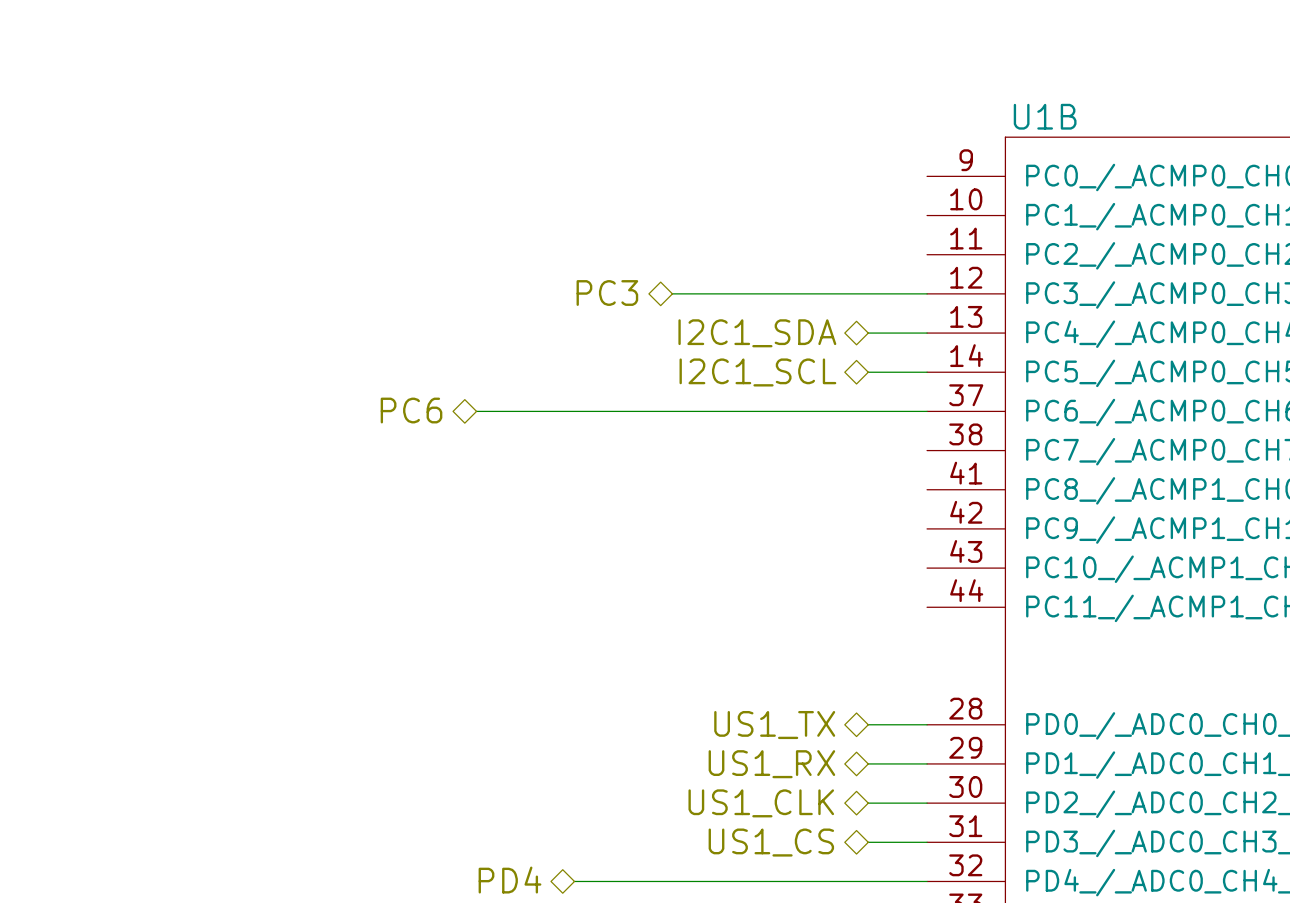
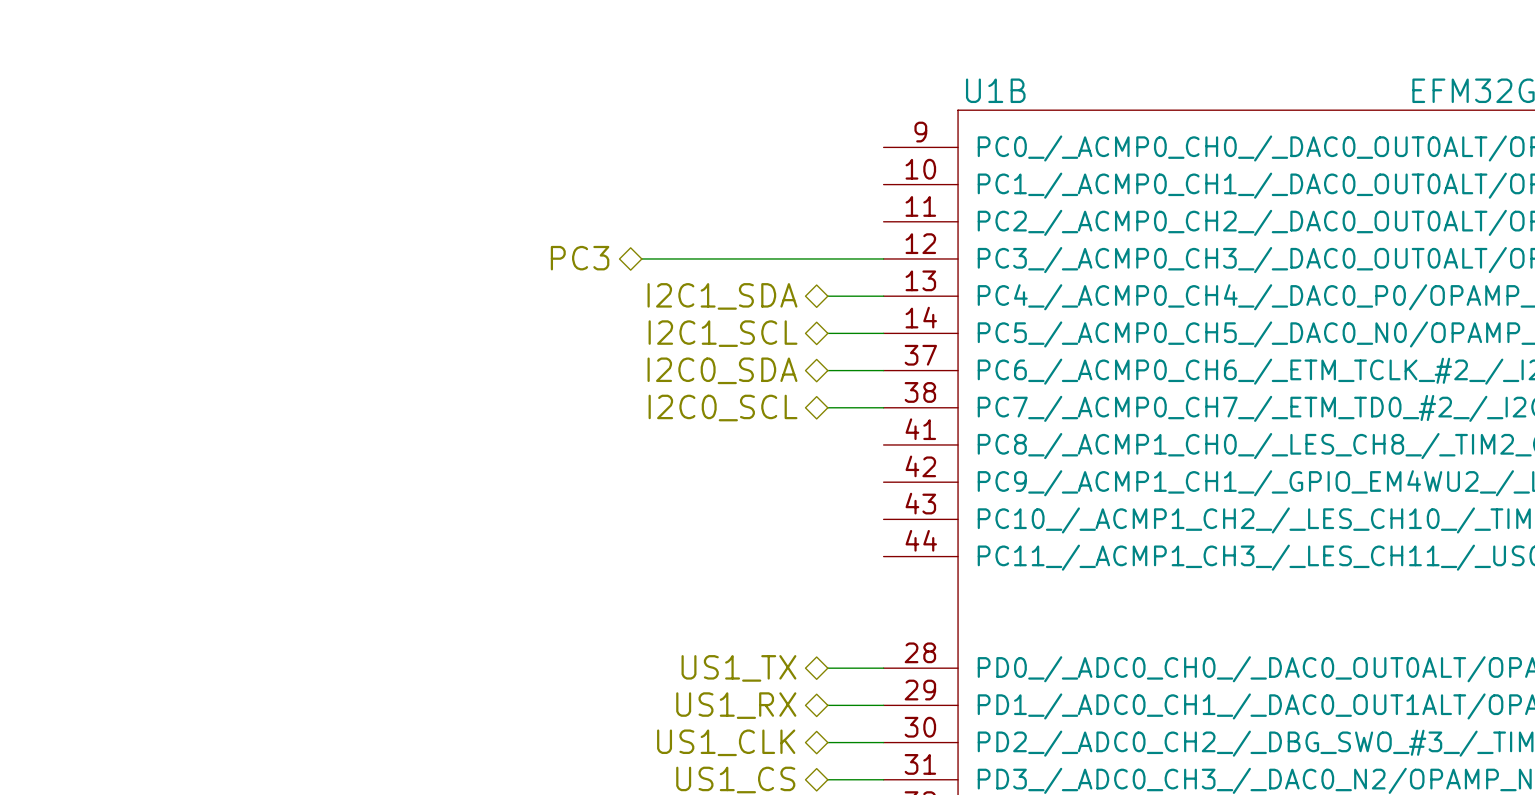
hierarchical label: PC6 (411, 410) -> none
wire: (476, 411) (868, 411) -> none
hierarchical label: none -> I2C0_SDA (722, 370)
hierarchical label: none -> I2C0_SCL (723, 408)
wire: none -> (827, 407) (883, 407)

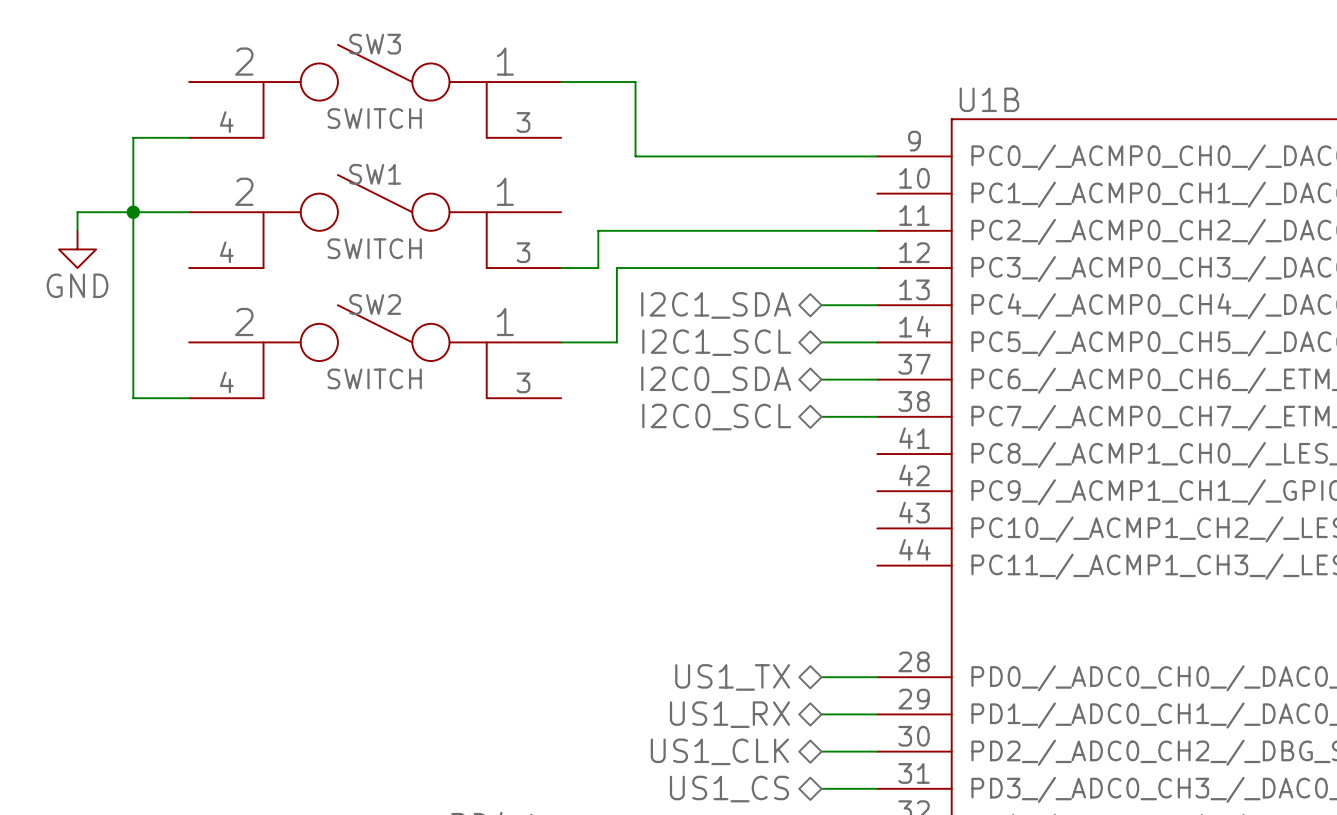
wire: none -> (561, 82) (635, 82) (635, 156) (877, 156)
SW3: none -> SWITCH (375, 91)
wire: none -> (189, 137) (133, 137) (133, 398) (189, 398)
junction: none -> (133, 212)
wire: none -> (189, 212) (77, 212) (77, 230)
SW1: none -> SWITCH (375, 221)
wire: none -> (877, 230) (598, 230) (598, 268) (561, 268)
power symbol: none -> GND (77, 249)
hierarchical label: PC3 (580, 258) -> none
wire: none -> (635, 268) (616, 268) (616, 342) (561, 342)
SW2: none -> SWITCH (375, 351)

